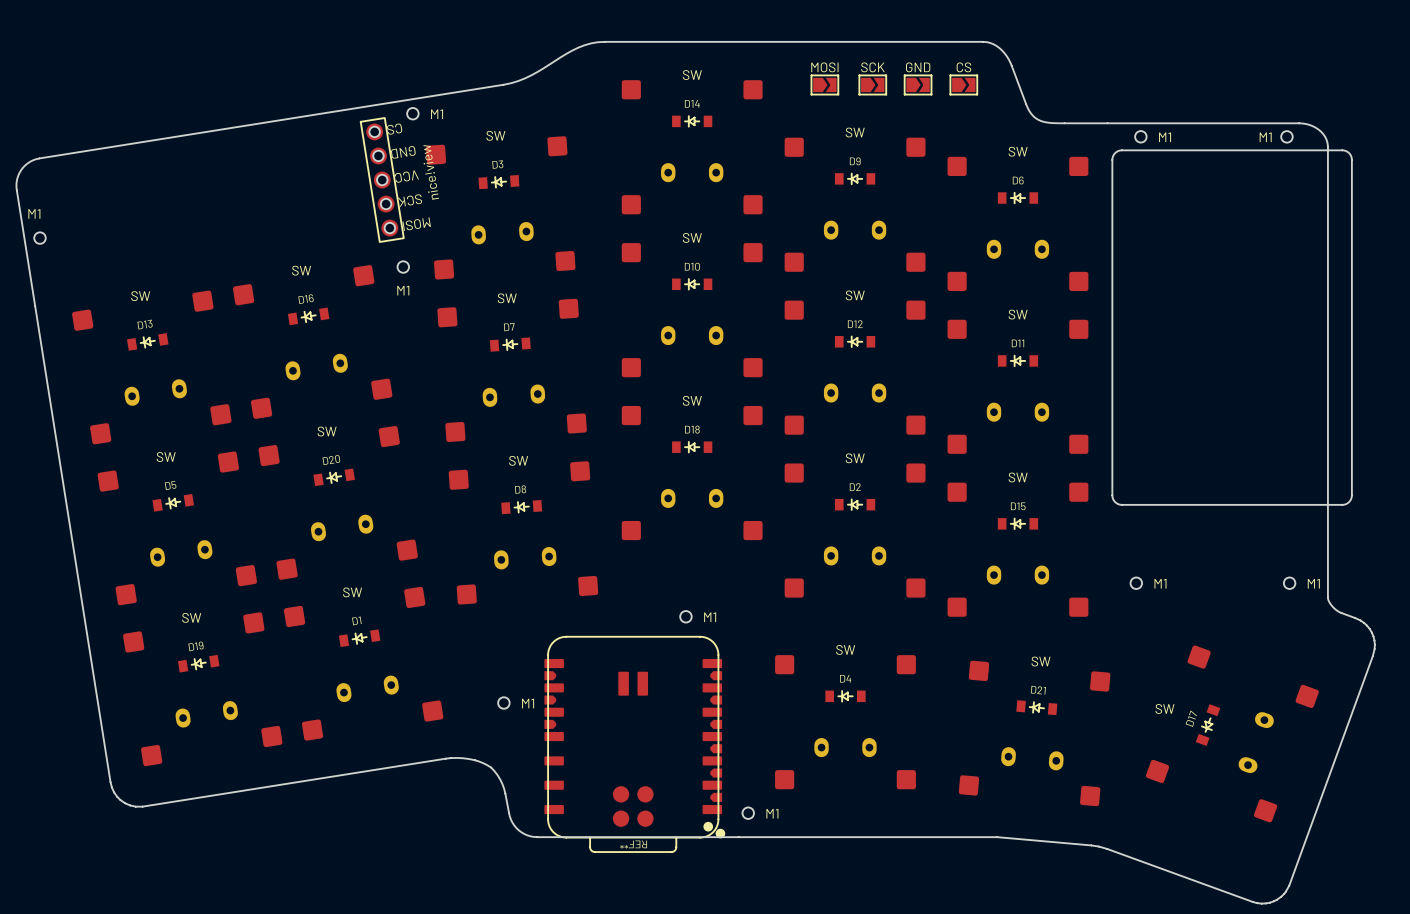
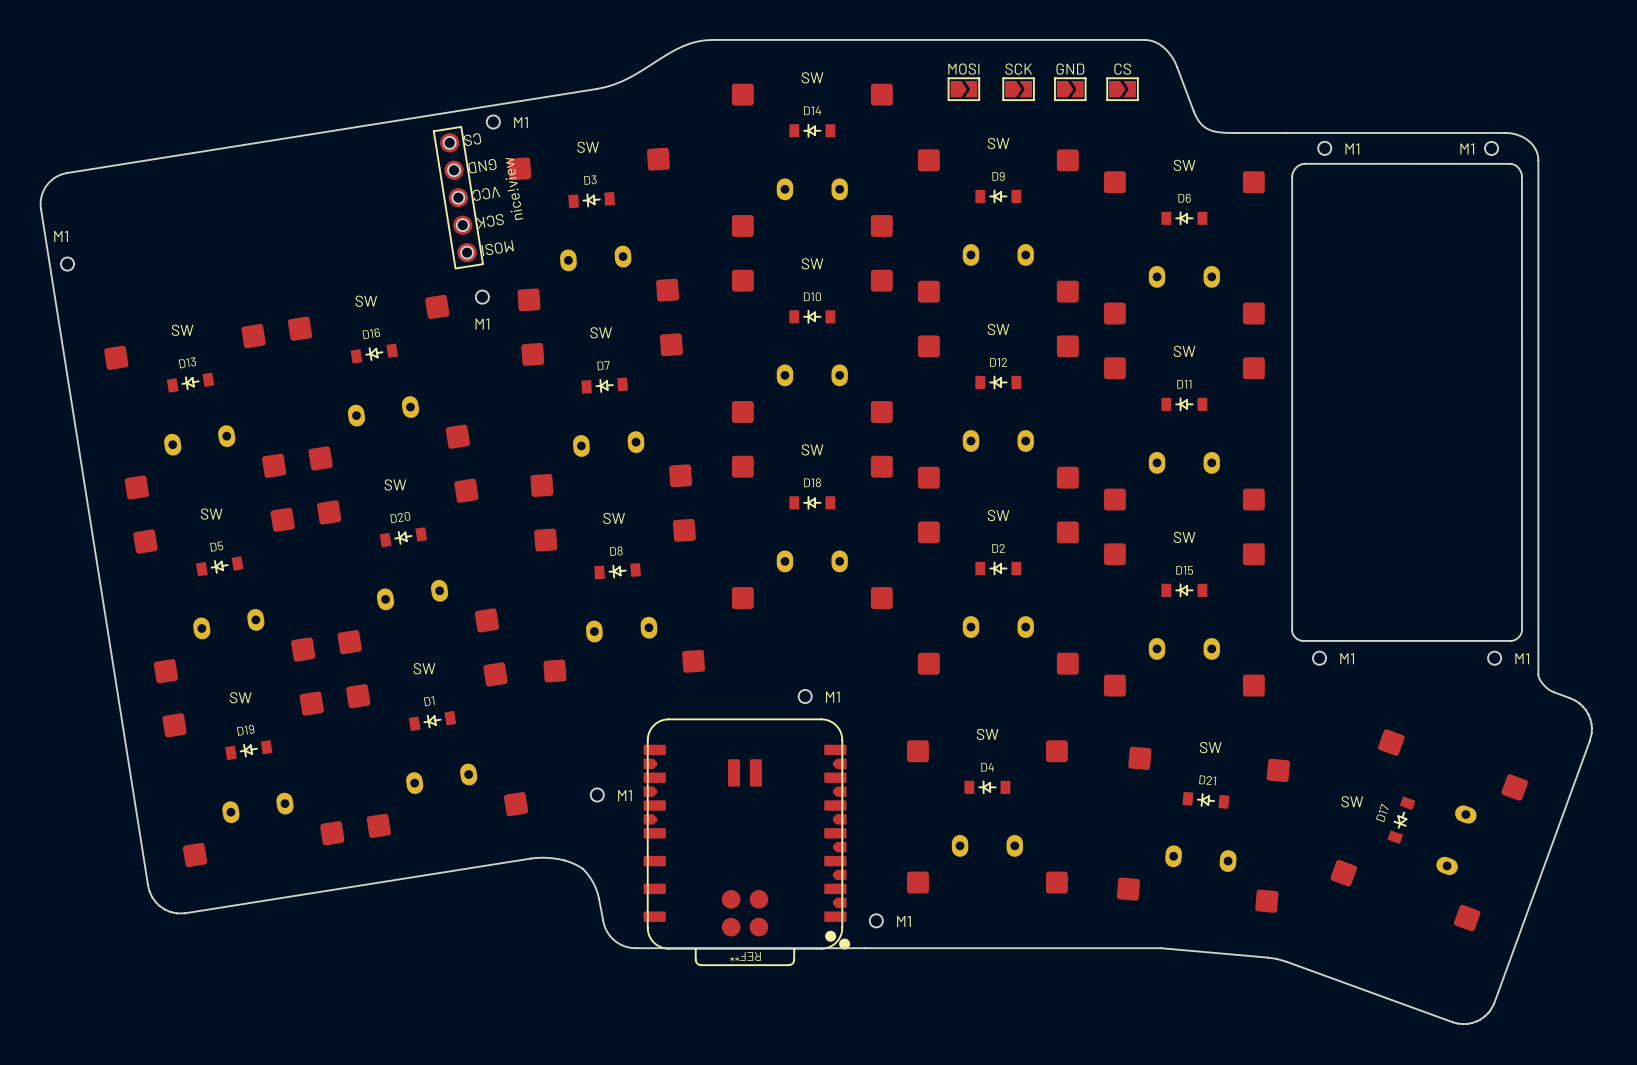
board edge: (1112, 161) (1114, 153) (1121, 150) (1342, 150) (1349, 153) (1351, 159) (1351, 495) (1350, 500) (1342, 504) (1121, 504) (1115, 502) (1112, 495) -> (1292, 176) (1296, 167) (1304, 163) (1509, 163) (1516, 165) (1520, 171) (1522, 630)
board edge: none -> (1292, 557) (1292, 631) (1294, 636) (1300, 640) (1511, 640) (1518, 637) (1522, 630)

